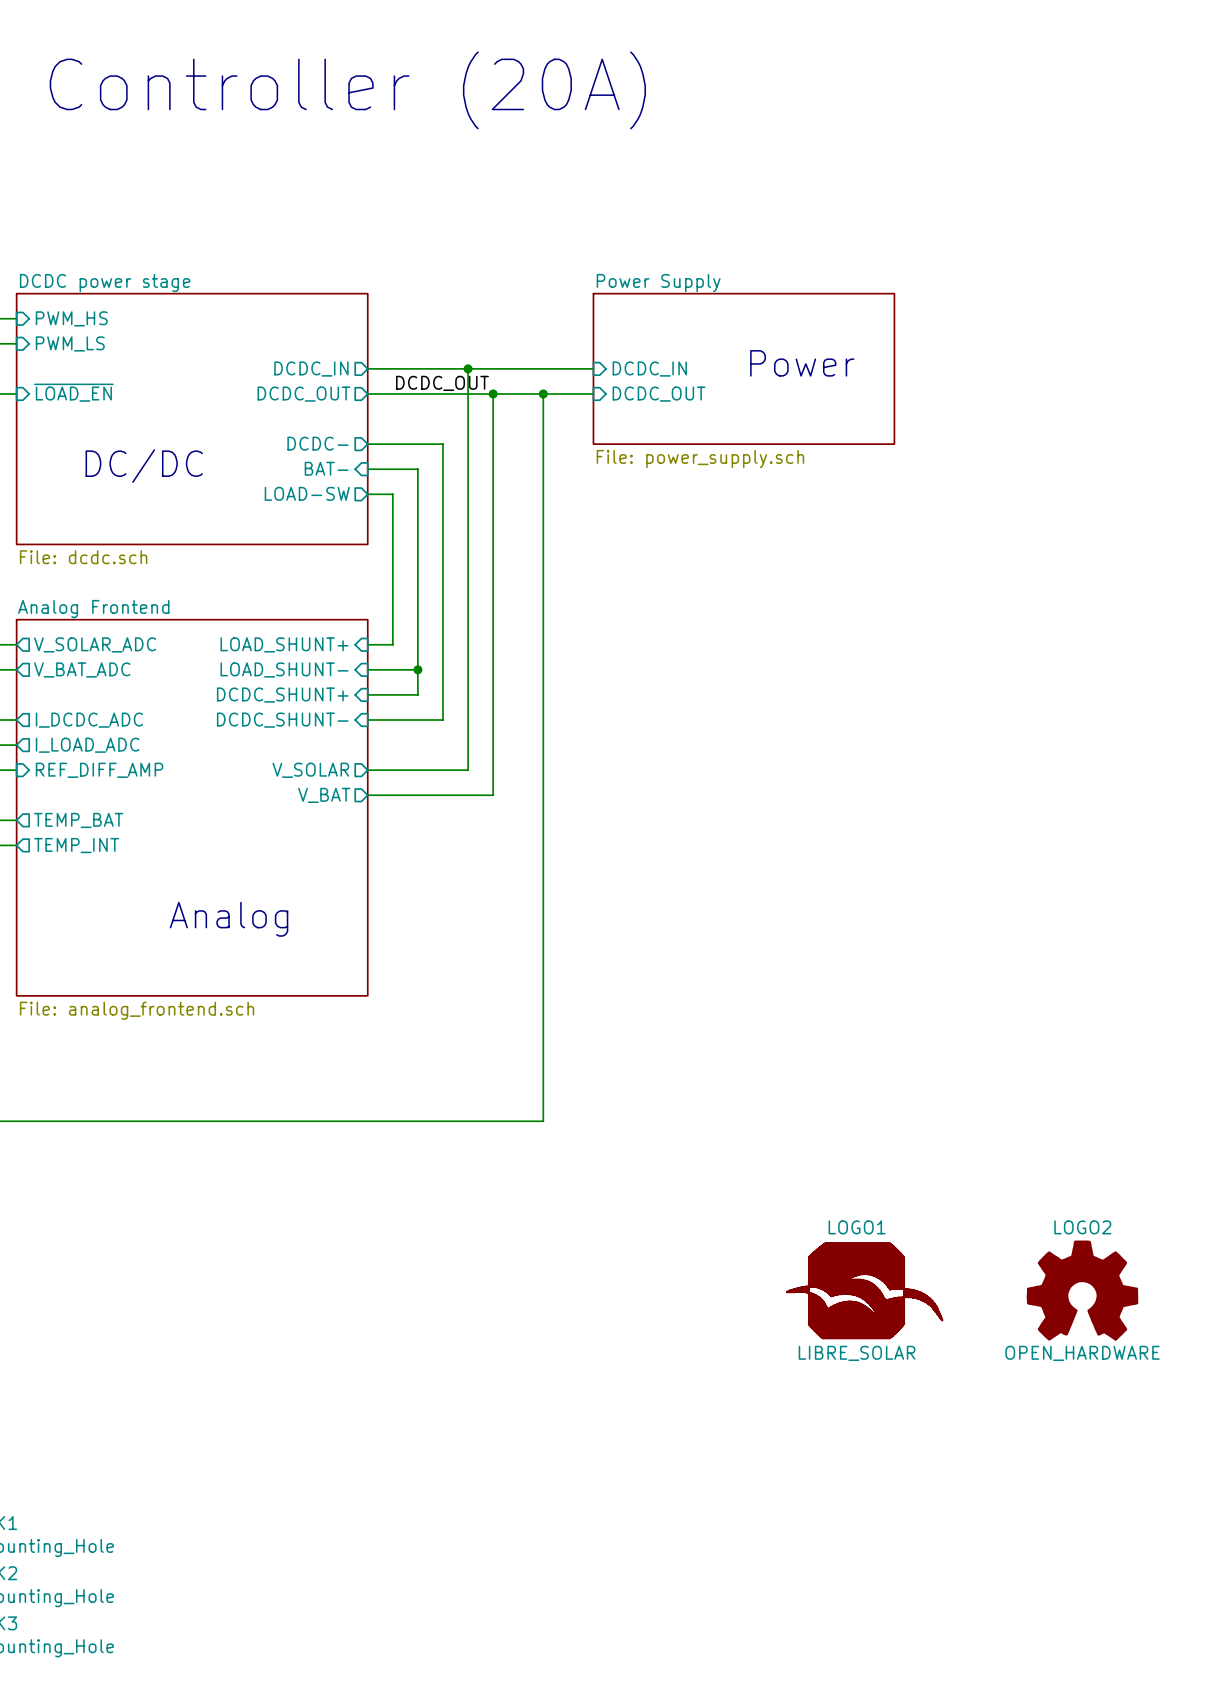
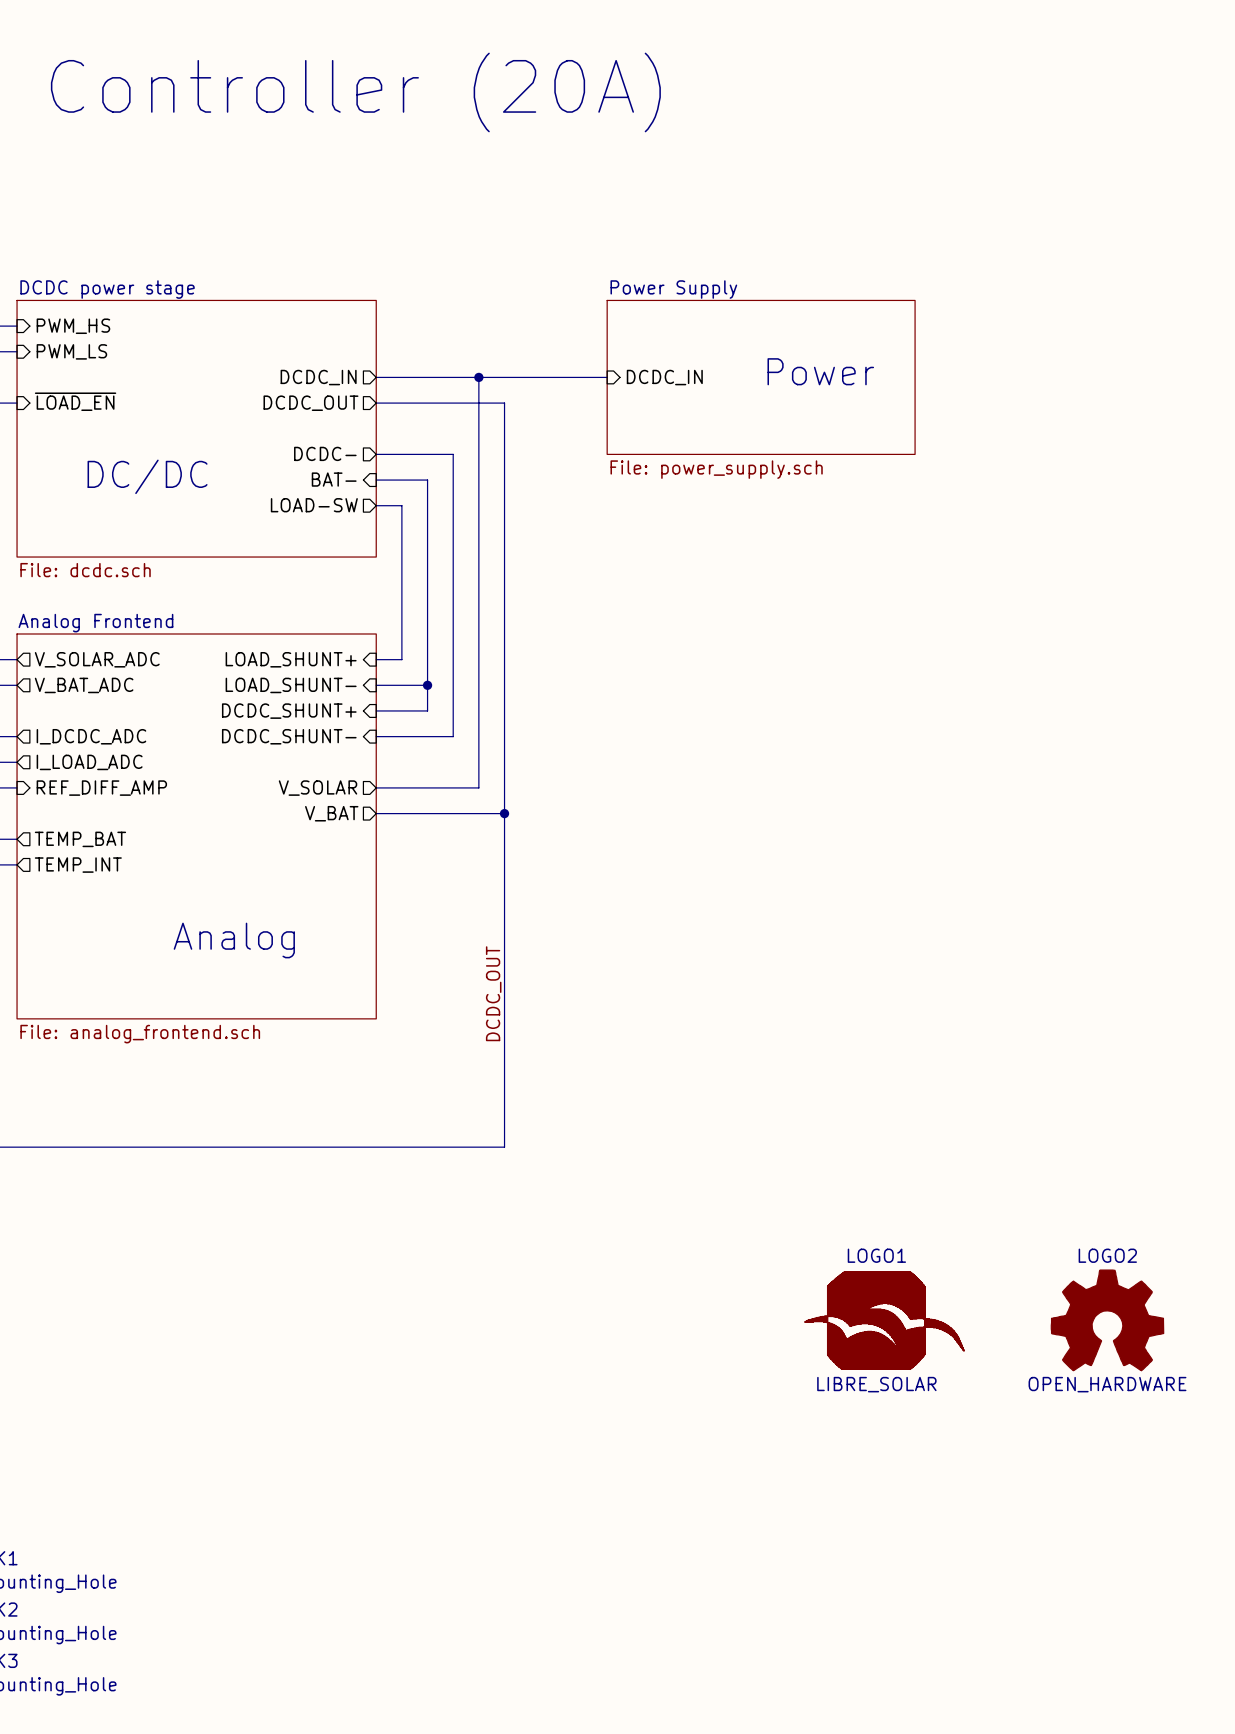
label: DCDC_OUT (442, 383) -> none
wire: (493, 393) (593, 393) -> none
junction: (493, 393) -> none
wire: (543, 393) (543, 1121) (493, 1121) -> (504, 813) (504, 1147)
junction: (543, 393) -> none
sheet pin: DCDC_OUT (659, 394) -> none
junction: none -> (504, 813)
label: none -> DCDC_OUT (493, 993)

